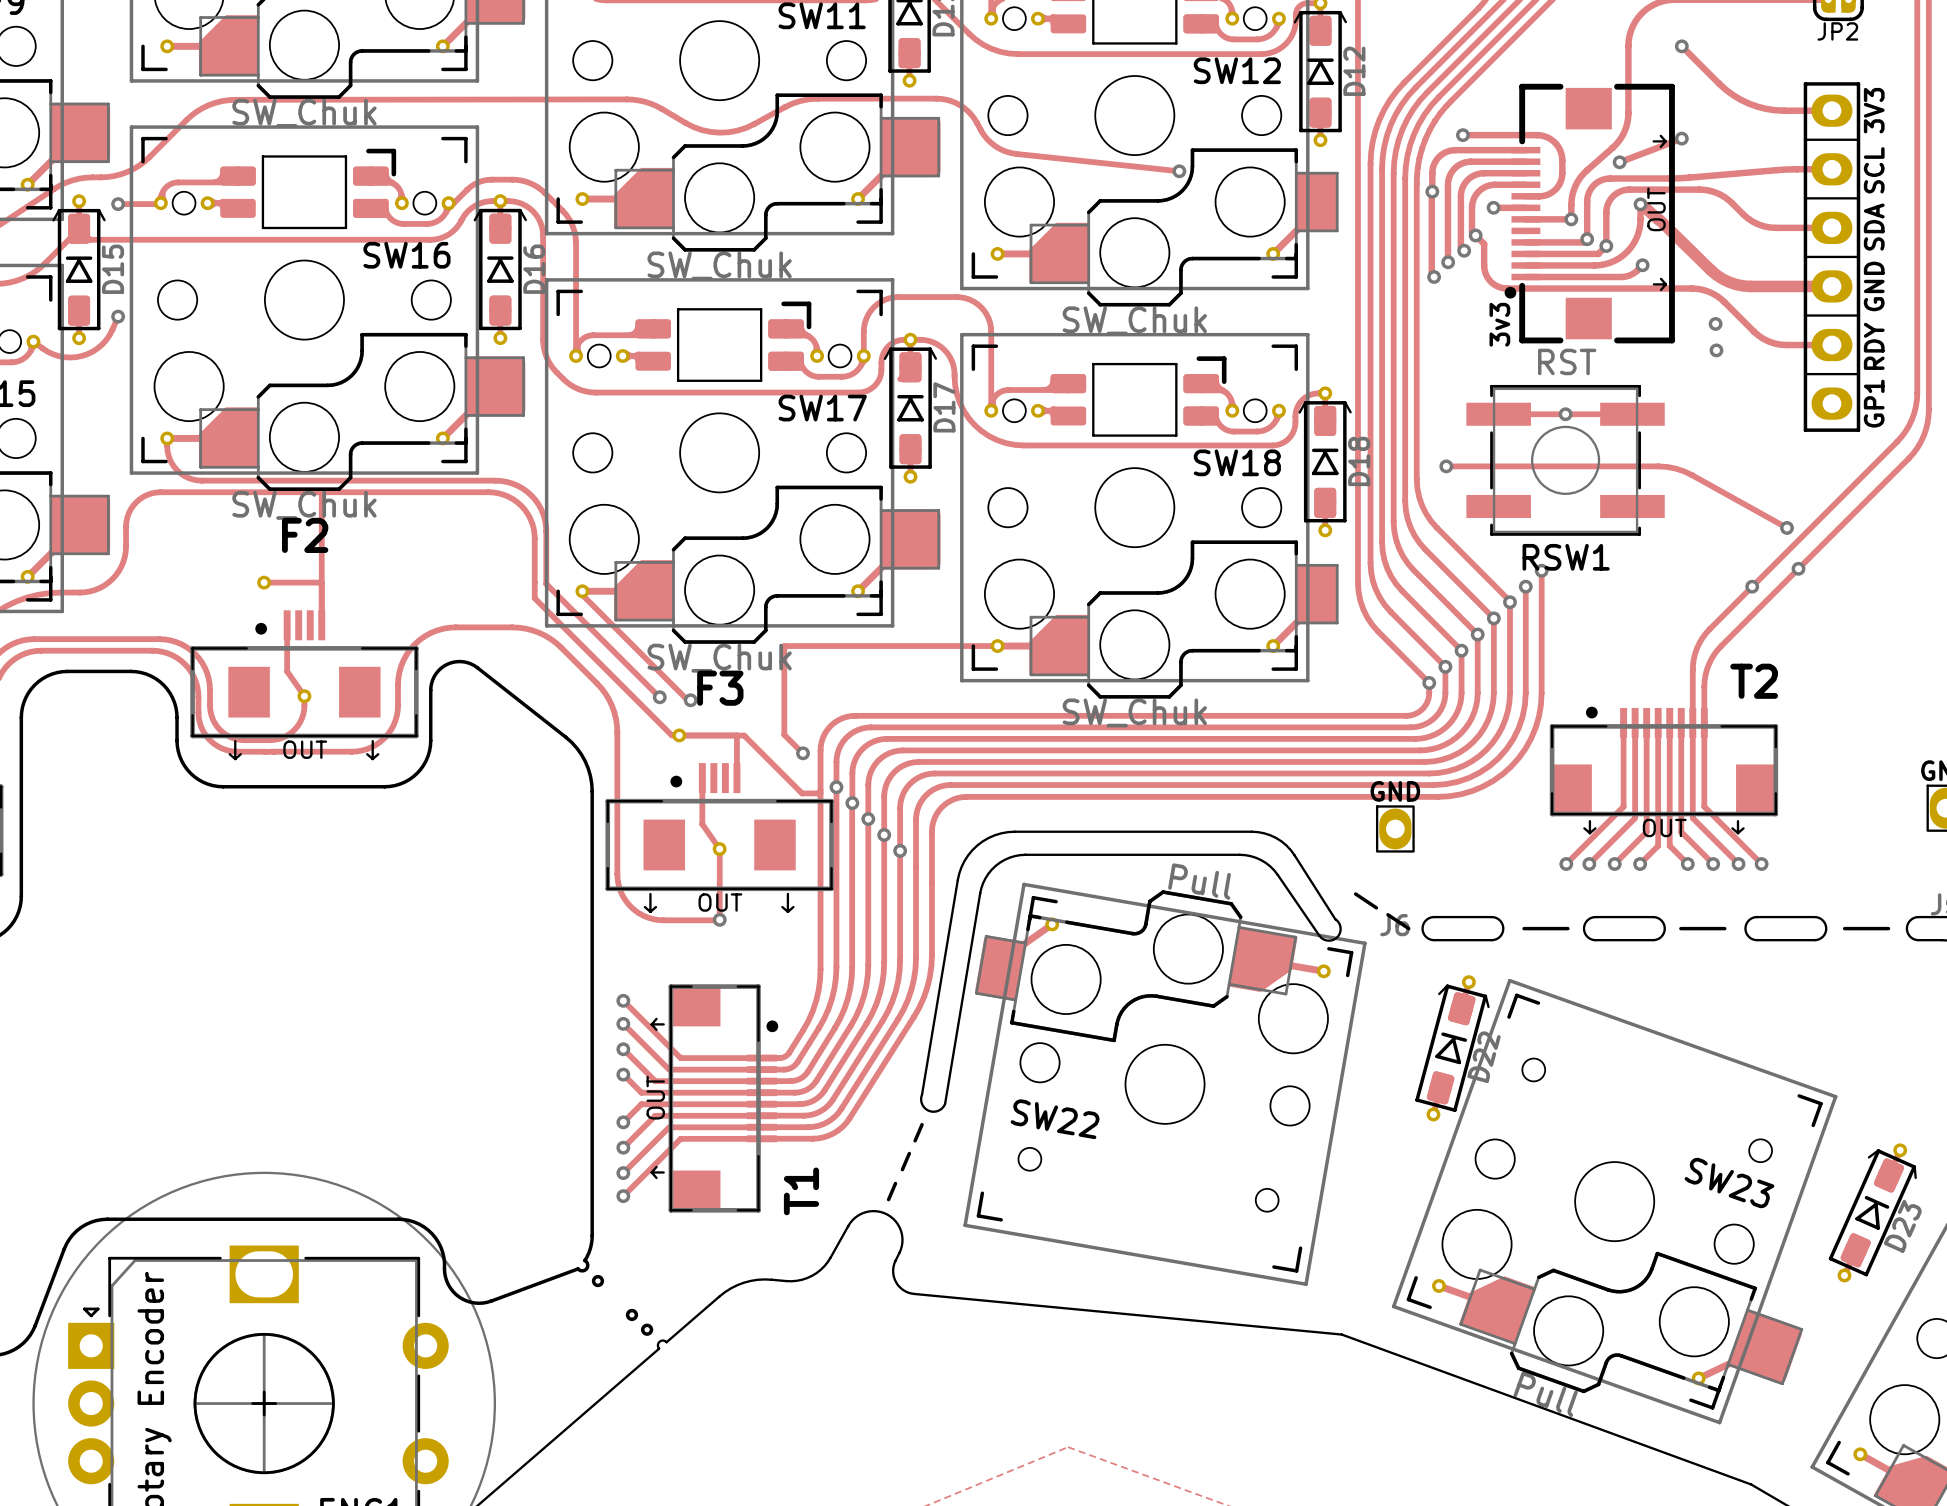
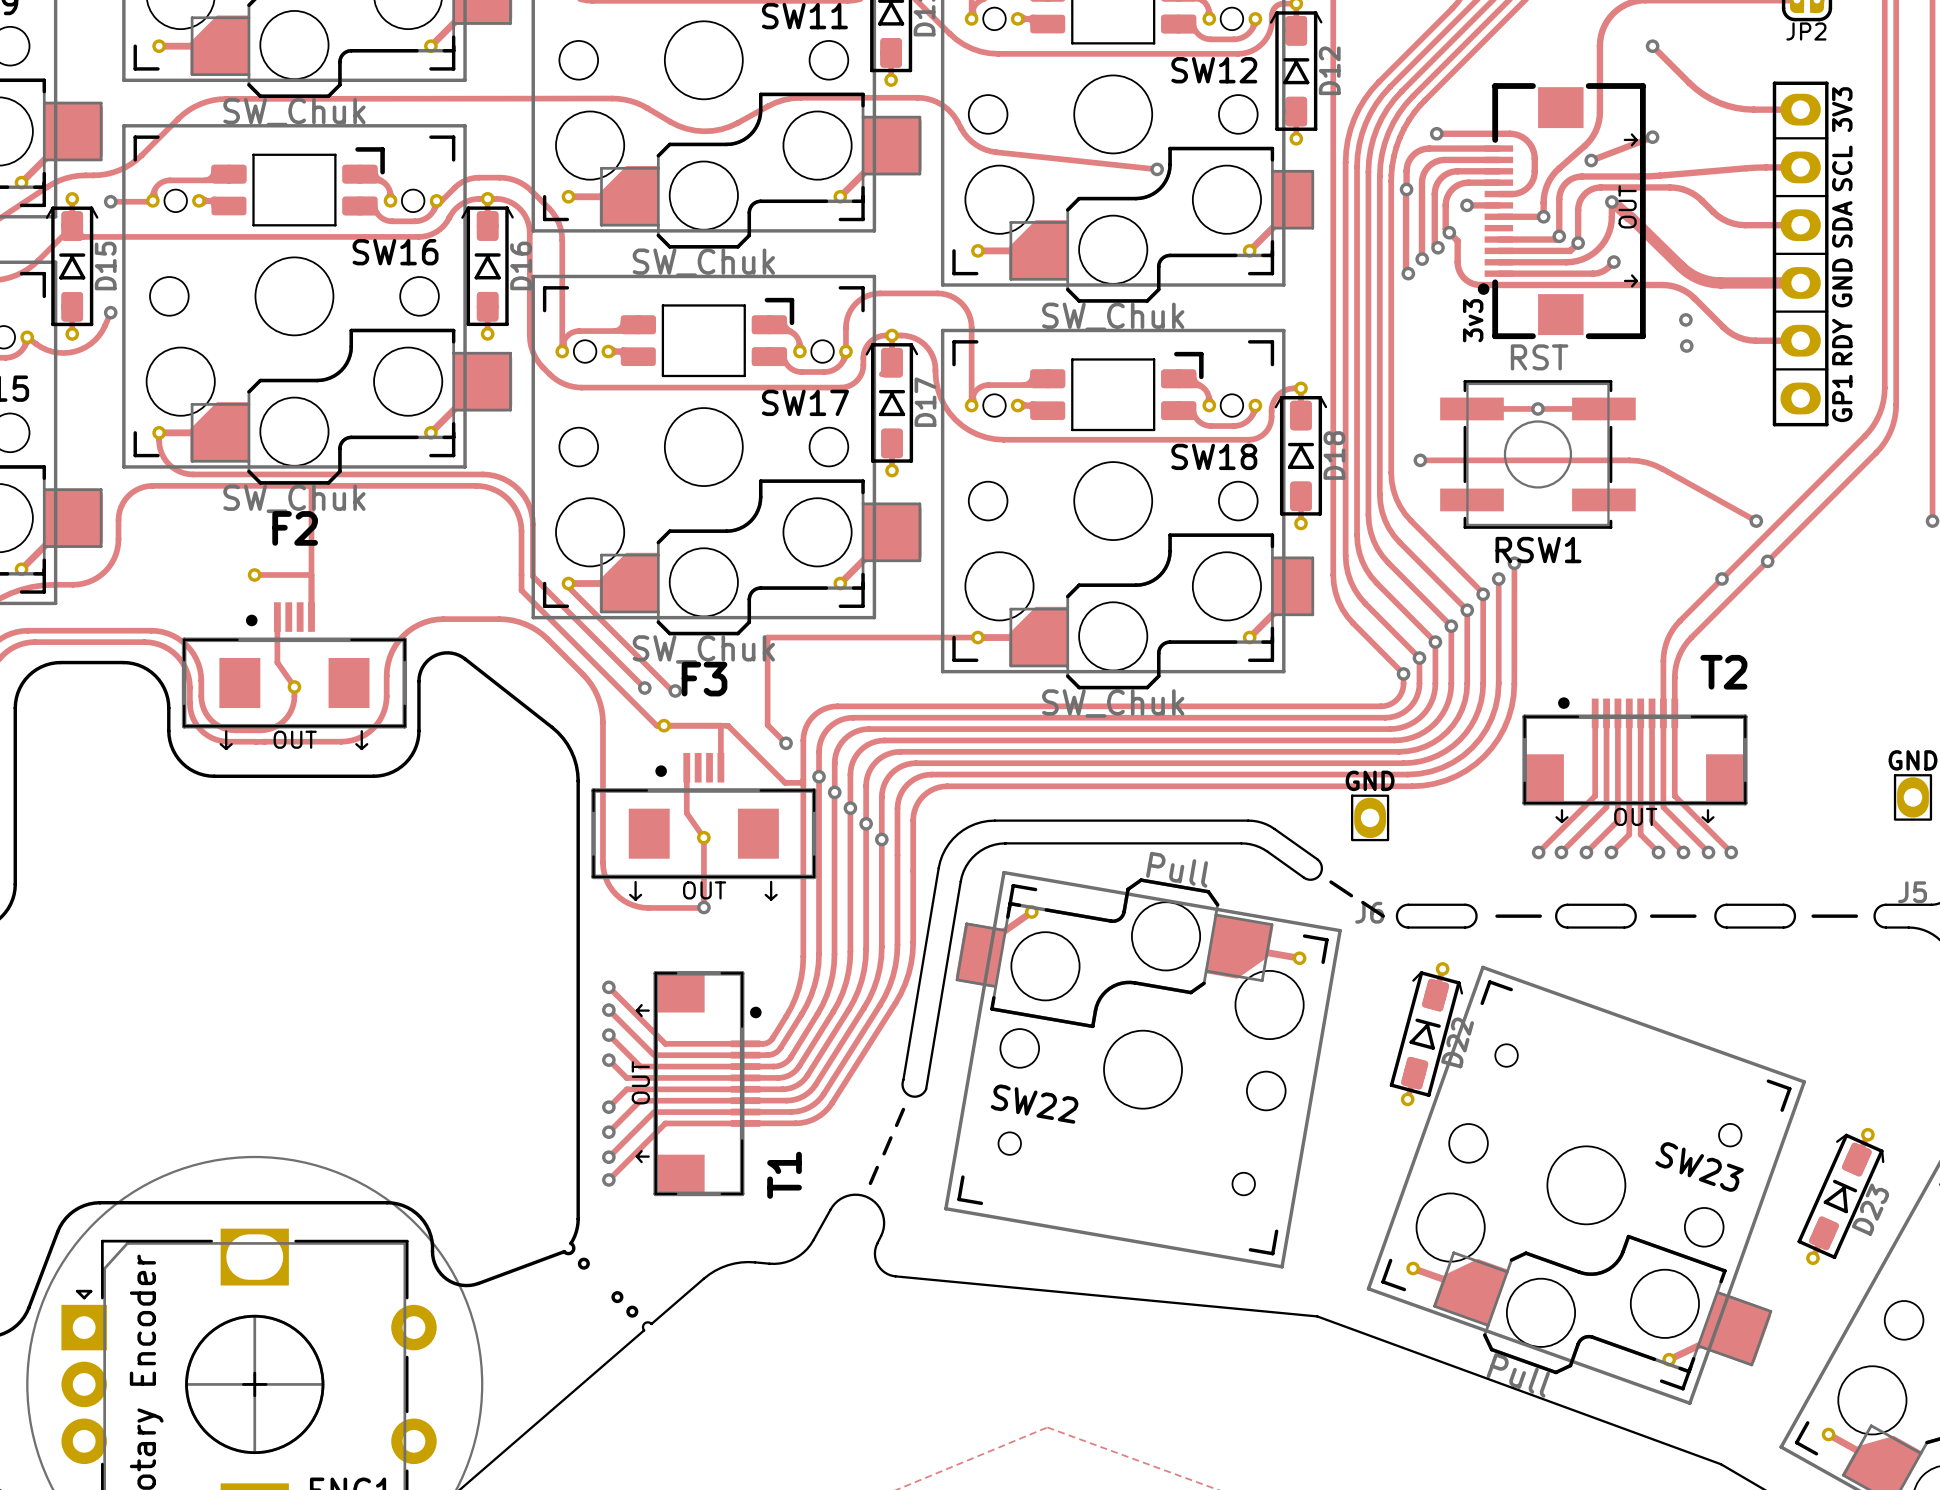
board edge: (1251, 831) (1270, 835) (1281, 841) (1290, 850) (1339, 923) (1340, 930) (1338, 936) (1329, 940) (1321, 937) (1274, 870) (1261, 860) (1239, 854) -> (1228, 820) (1252, 820) (1270, 826) (1318, 860) (1321, 866) (1320, 874) (1314, 879) (1306, 878) (1267, 851) (1255, 845) (1216, 843)

